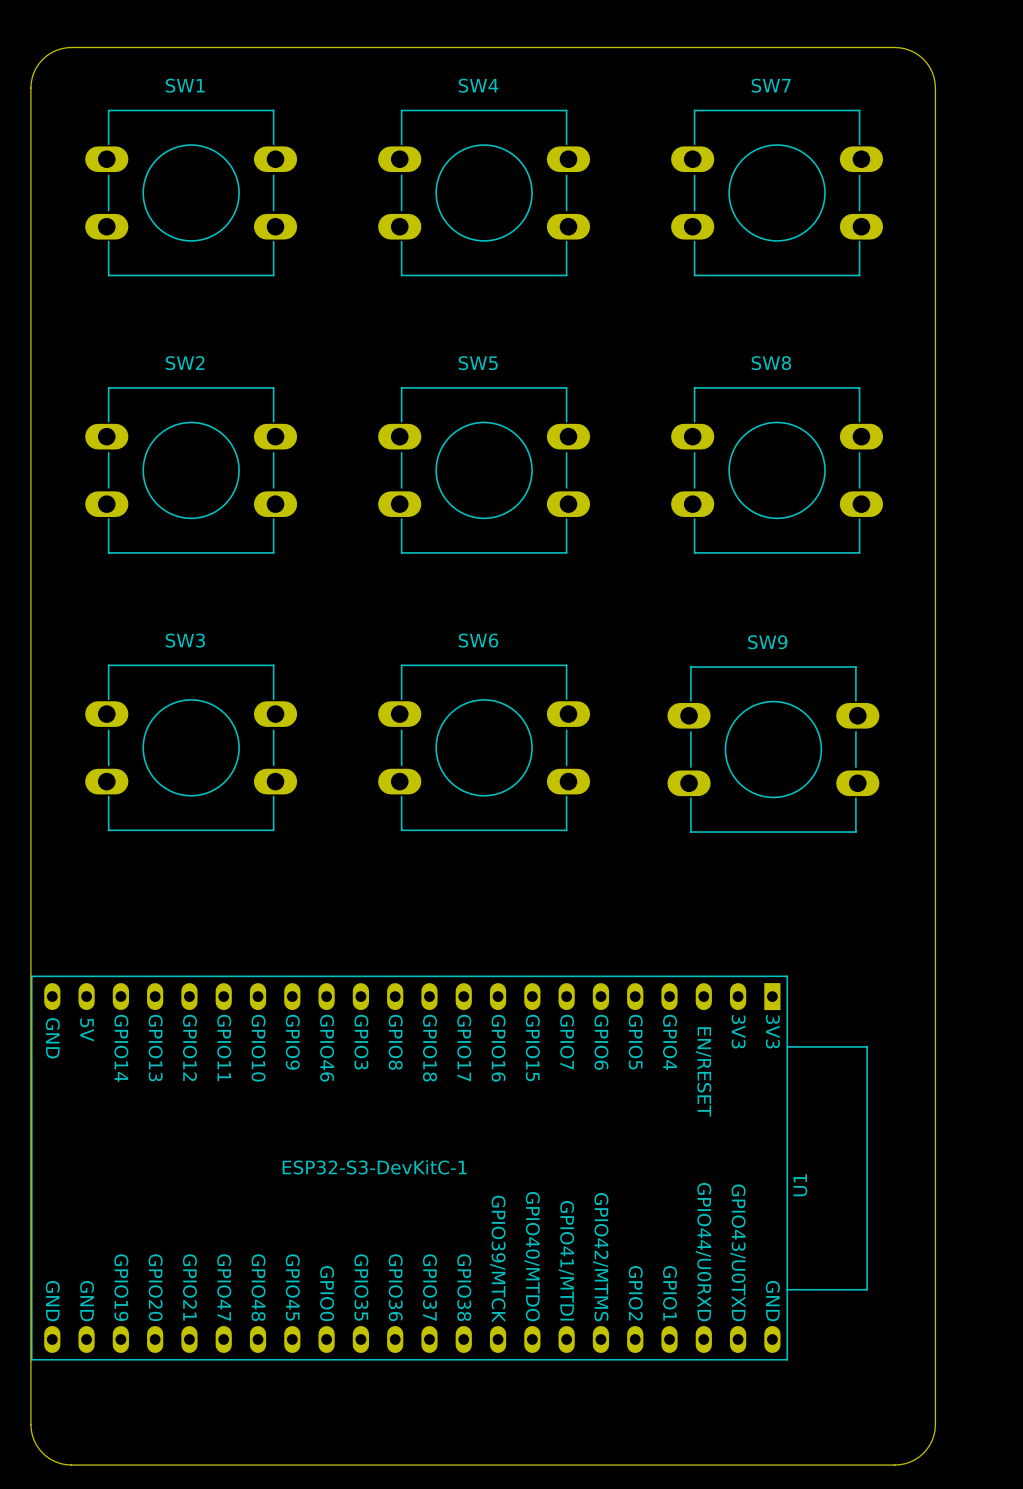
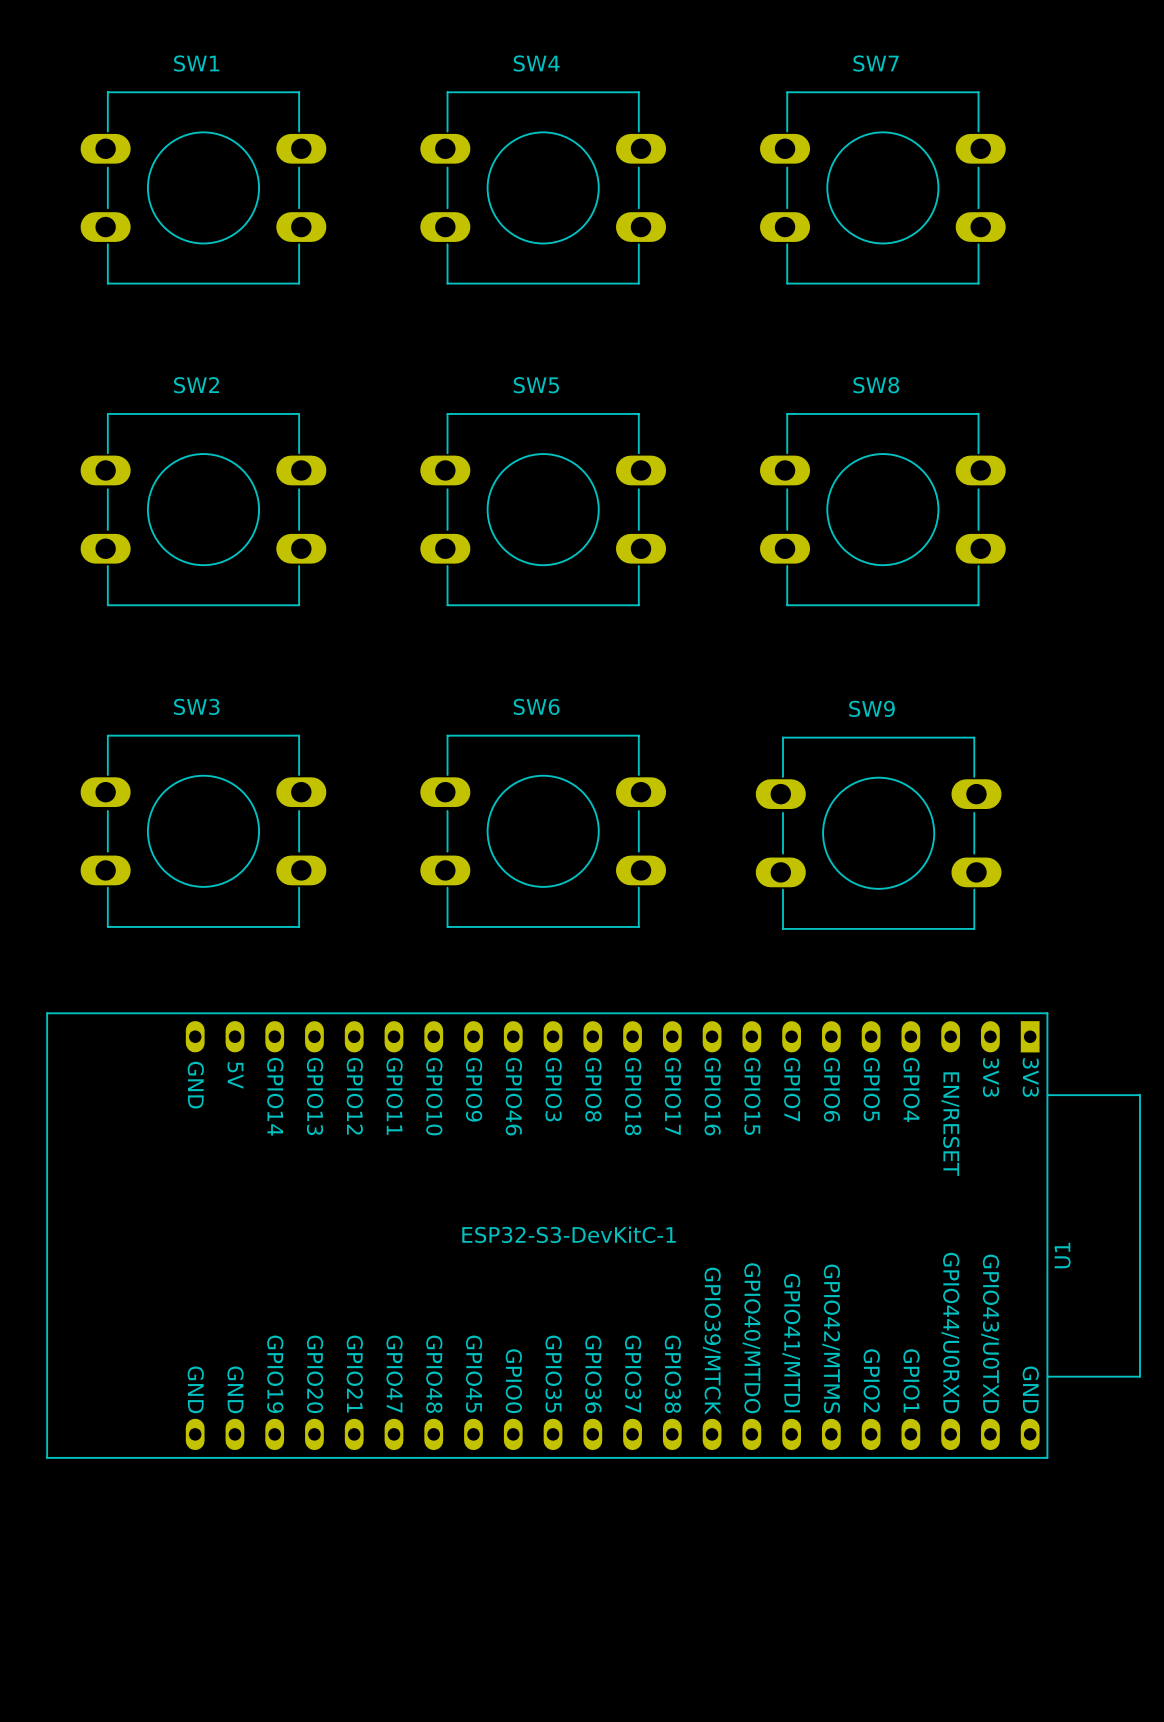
board edge: (71, 47) (894, 47) (915, 52) (930, 67) (935, 88) (935, 1424) (930, 1444) (915, 1459) (894, 1465) (71, 1465) (51, 1459) (36, 1444) (30, 1424) (30, 88) (33, 72) (42, 59) (55, 50) (71, 47) -> none
U1 footprint: [30, 975, 868, 1361] -> [46, 1012, 1141, 1459]
U1 value position: ESP32-S3-DevKitC-1 (374, 1167) -> ESP32-S3-DevKitC-1 (569, 1234)
U1 name position: U1 (800, 1185) -> U1 (1062, 1255)

